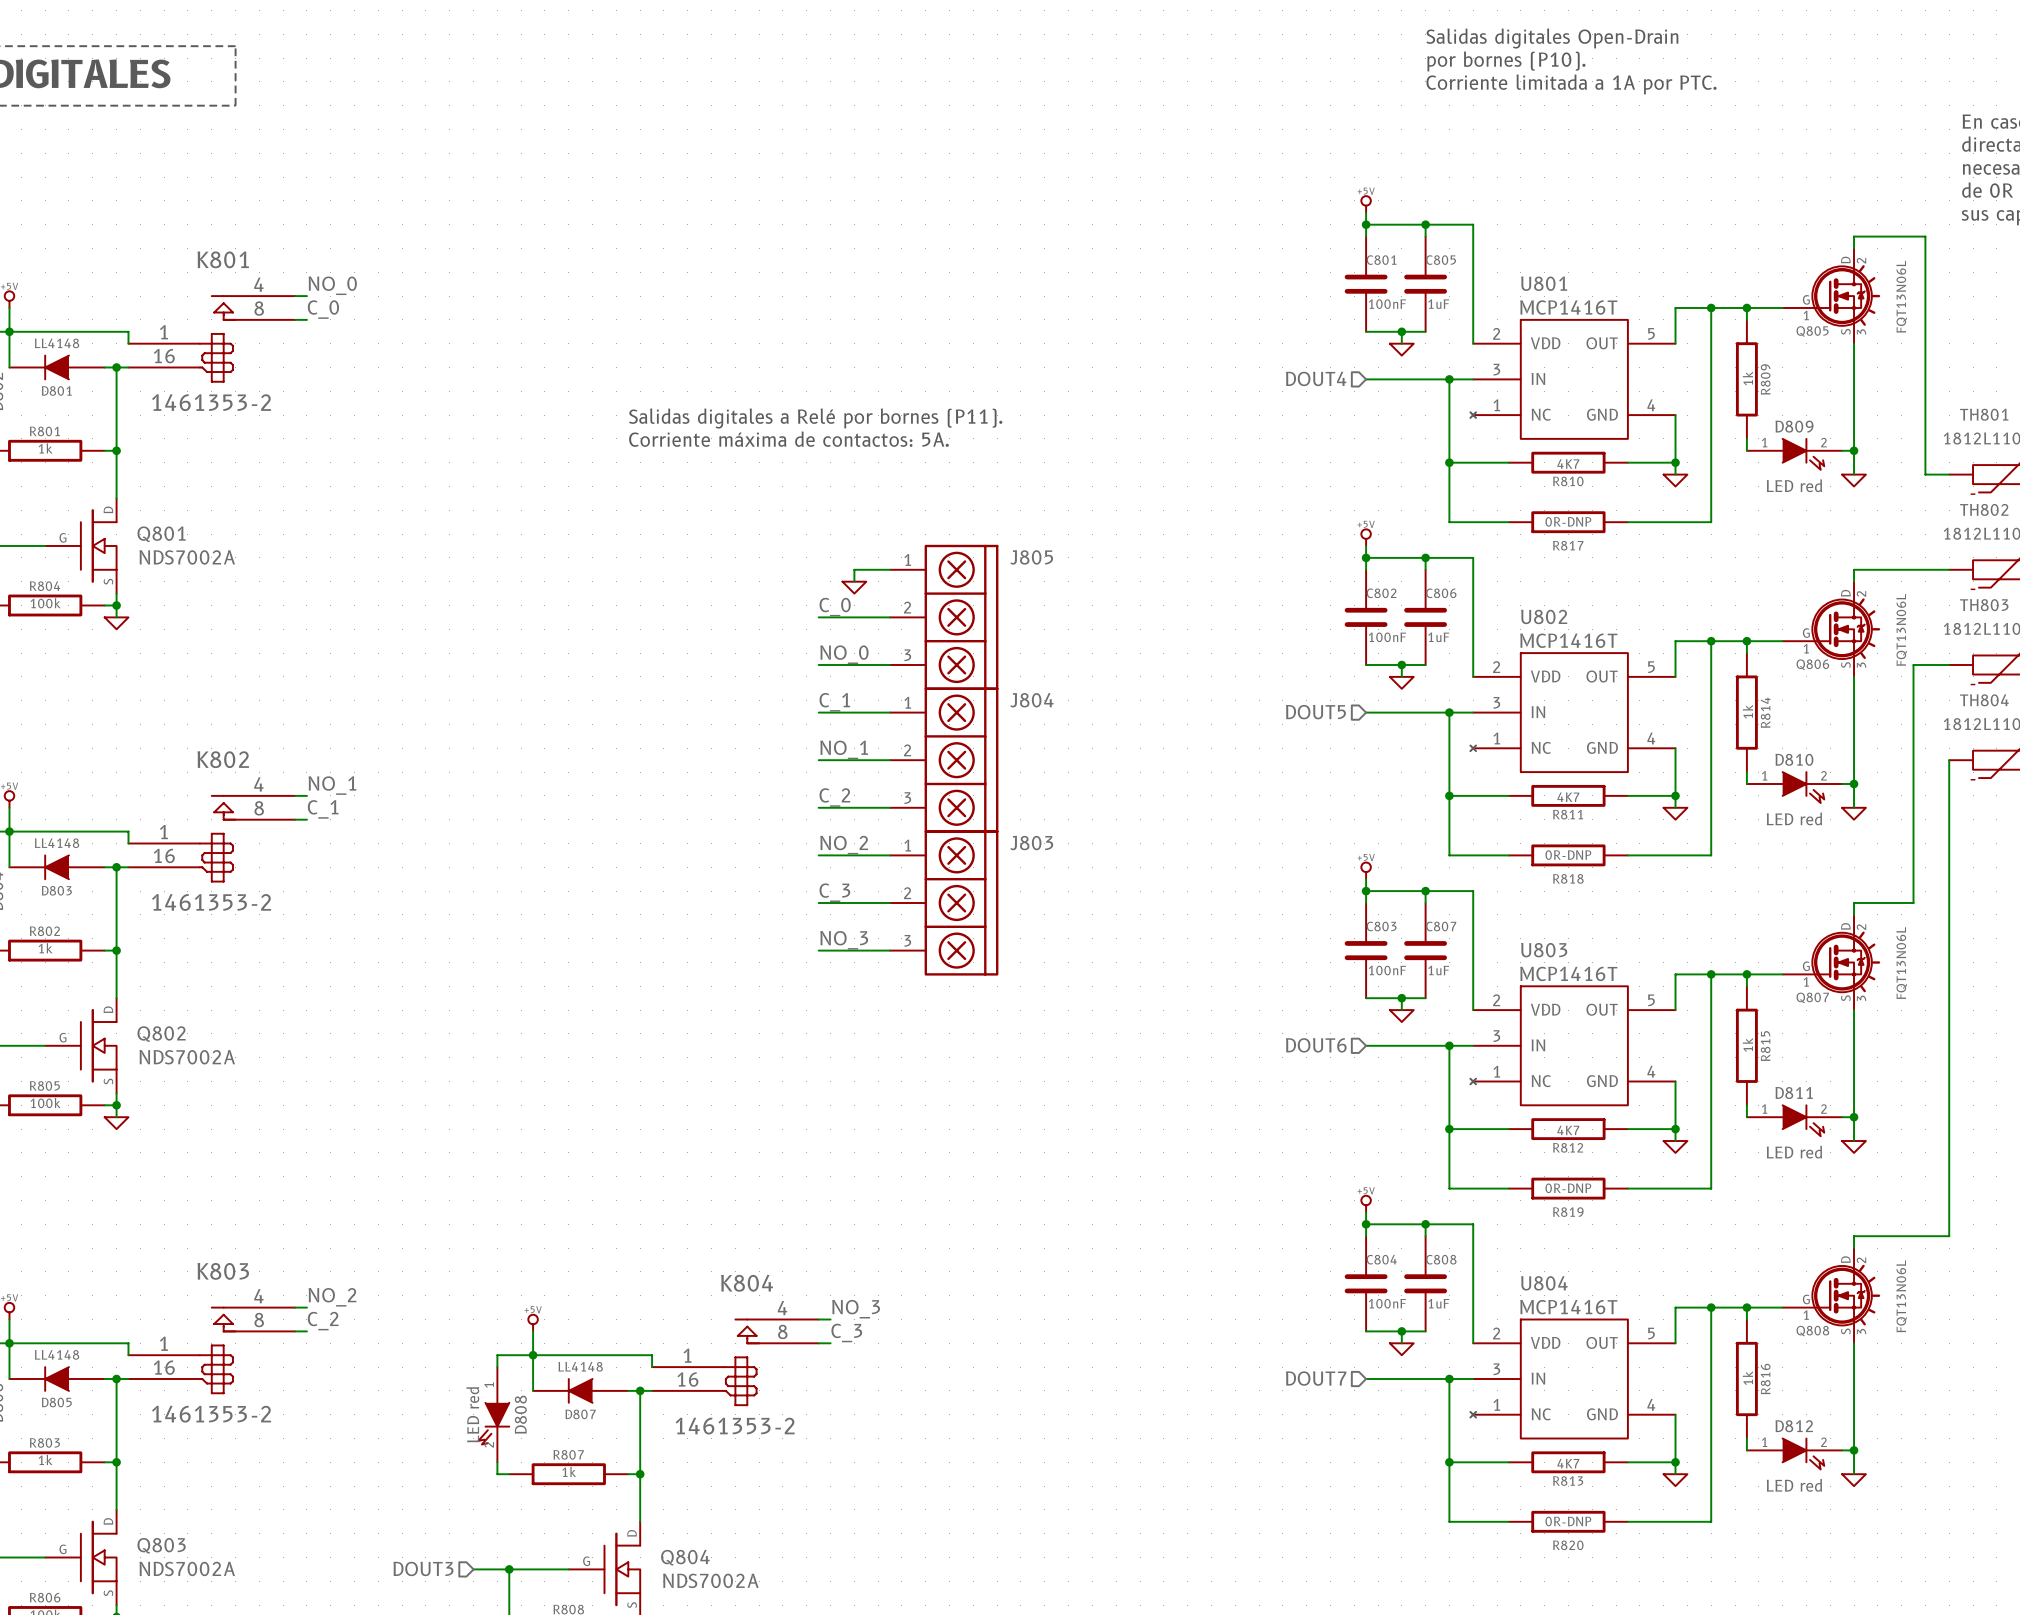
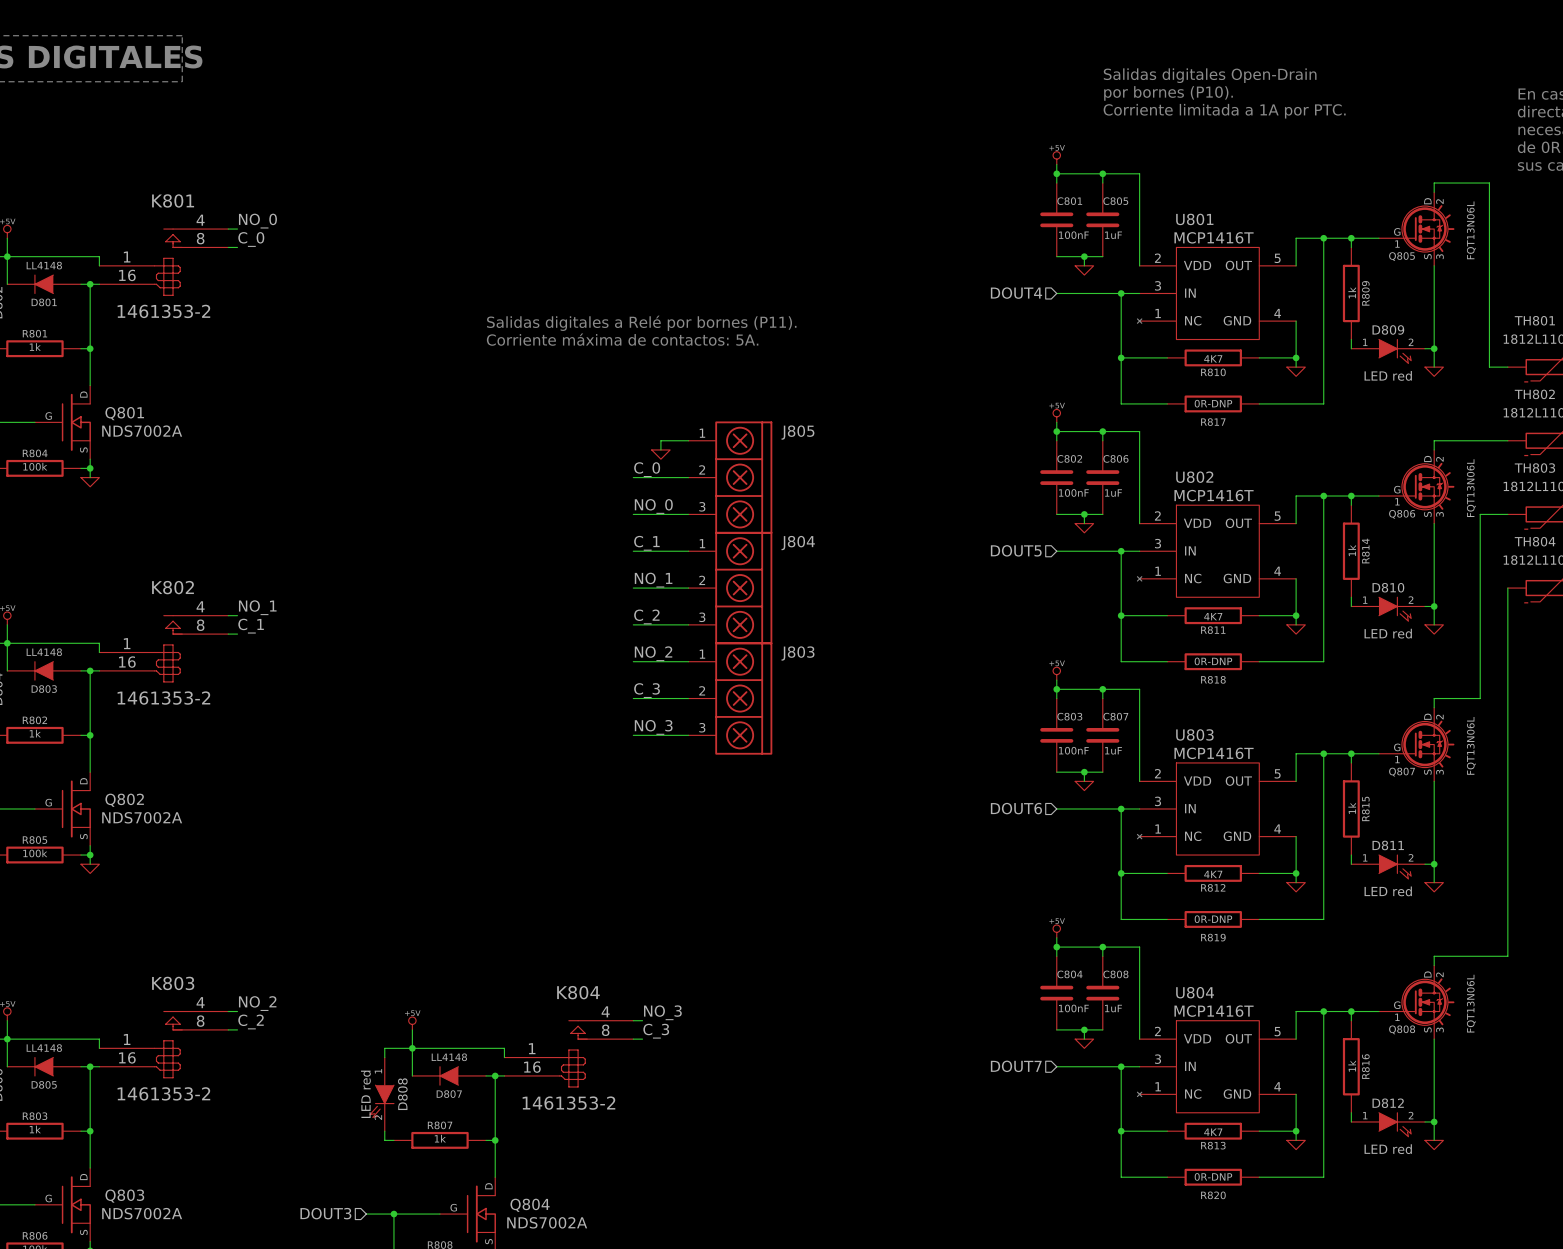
text position: Salidas digitales Open-Drain (1552, 38) -> Salidas digitales Open-Drain (1210, 75)
text position: por bornes (P10). (1506, 61) -> por bornes (P10). (1168, 93)
text position: Corriente limitada a 1A por PTC. (1571, 84) -> Corriente limitada a 1A por PTC. (1224, 111)

